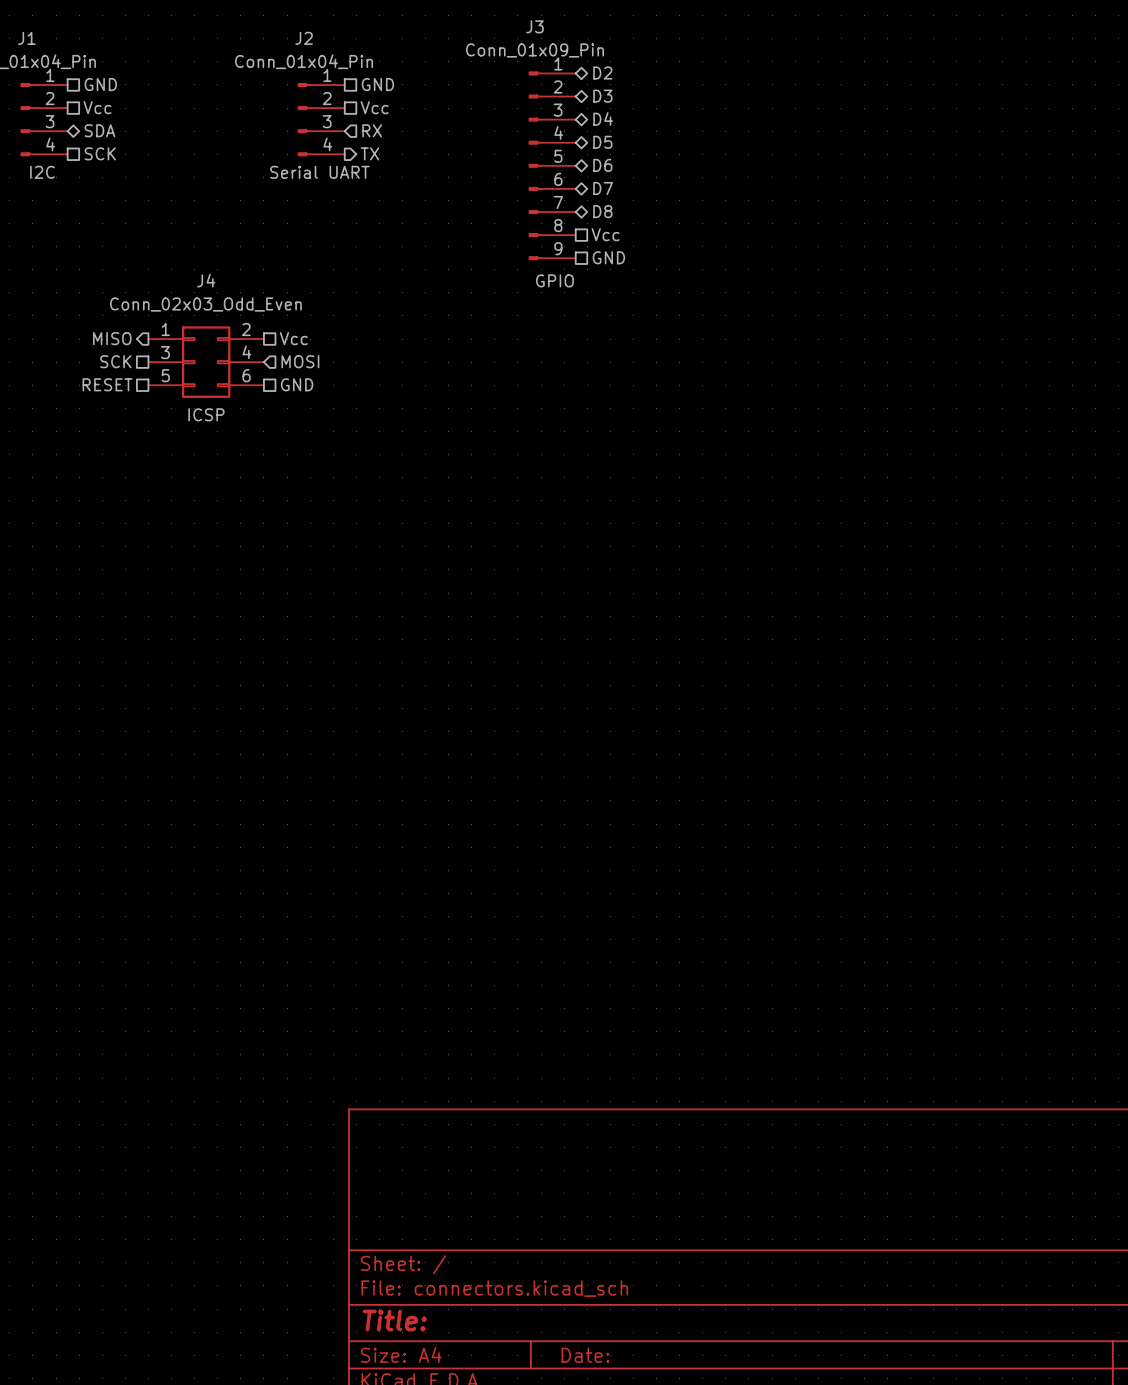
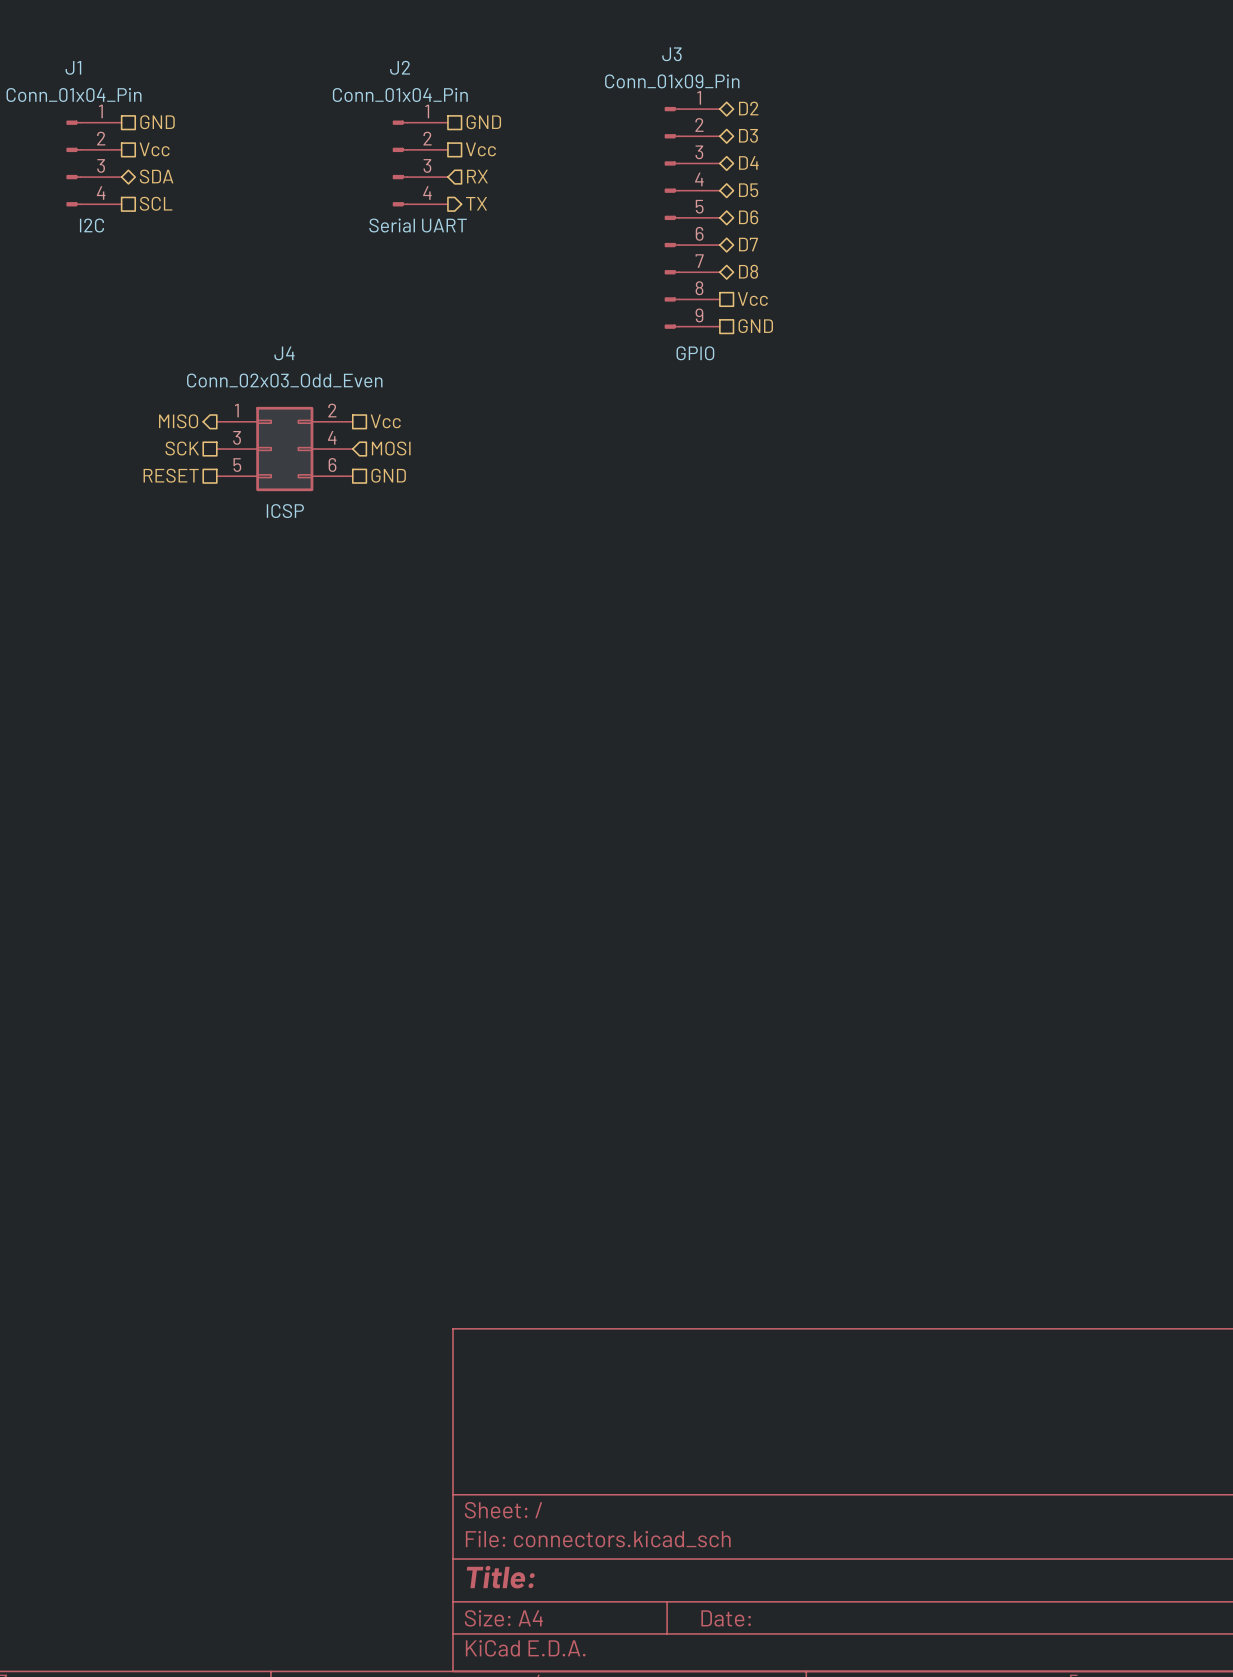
hierarchical label: SCK (100, 153) -> SCL (156, 203)

